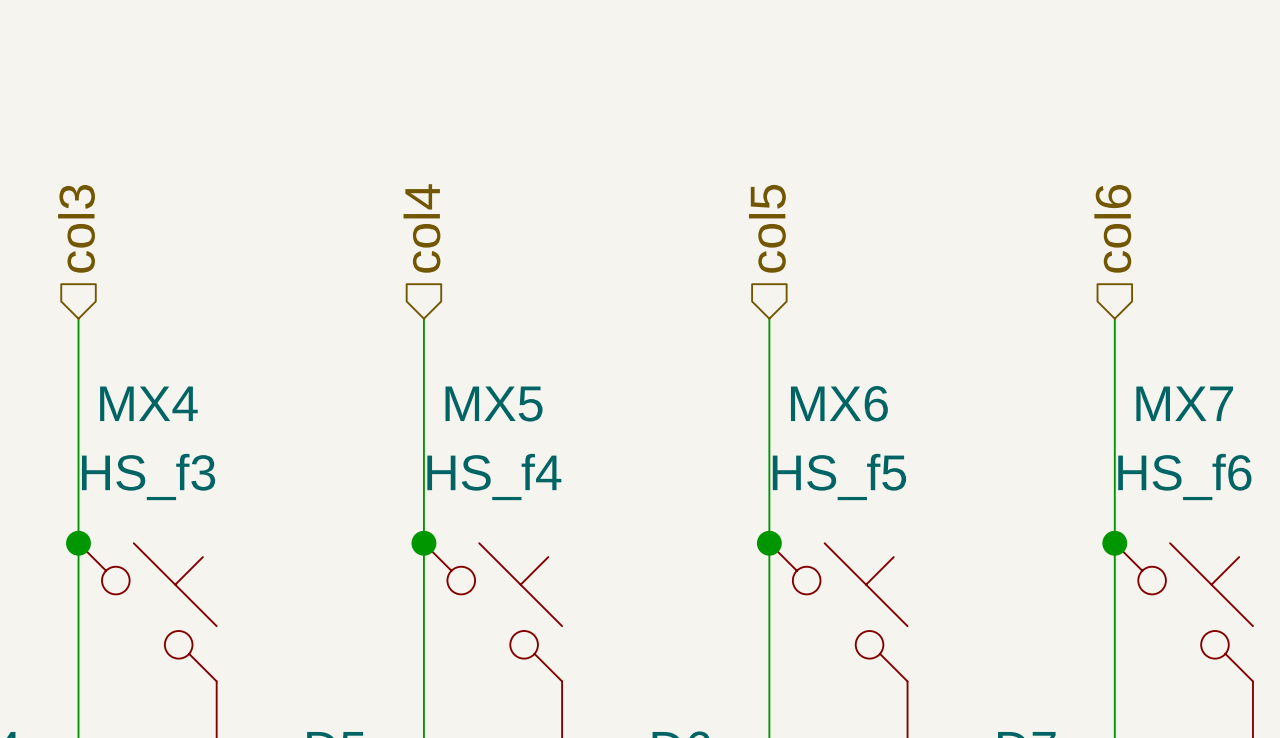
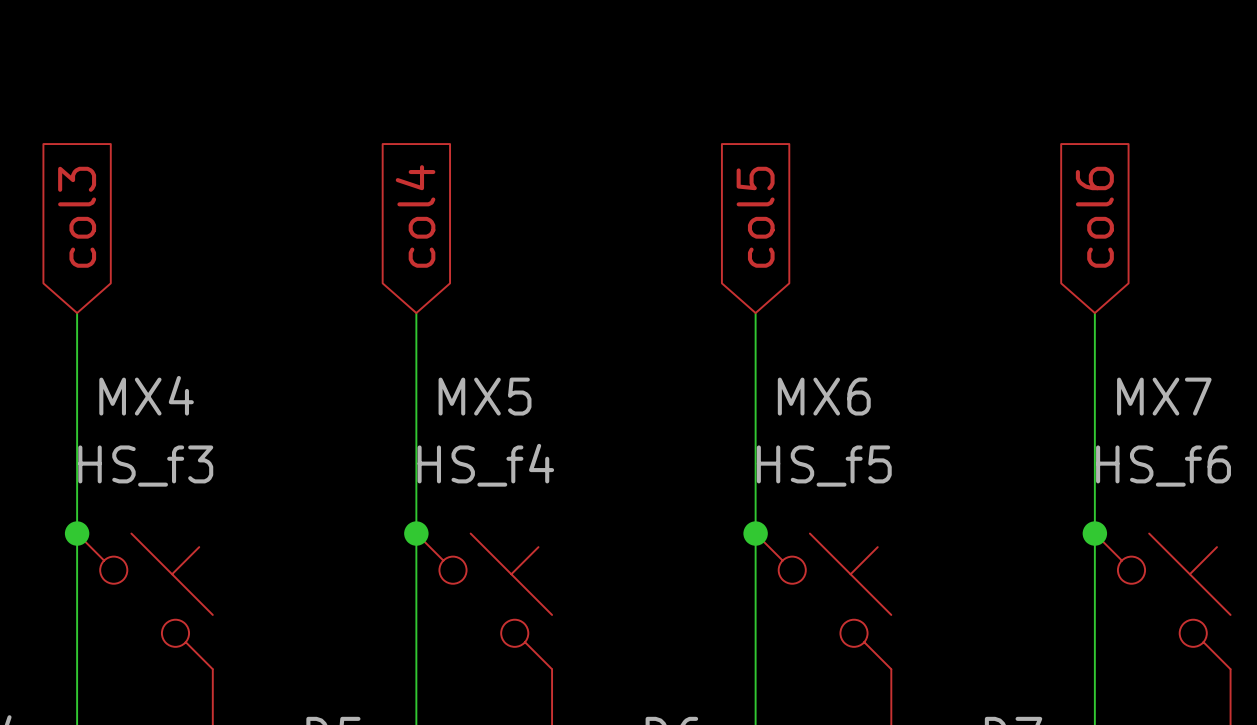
hierarchical label: col3 (76, 228) -> none
hierarchical label: col4 (421, 228) -> none
hierarchical label: col5 (767, 228) -> none
hierarchical label: col6 (1112, 228) -> none
global label: none -> col3 (77, 217)
global label: none -> col4 (415, 216)
global label: none -> col5 (755, 217)
global label: none -> col6 (1094, 217)

